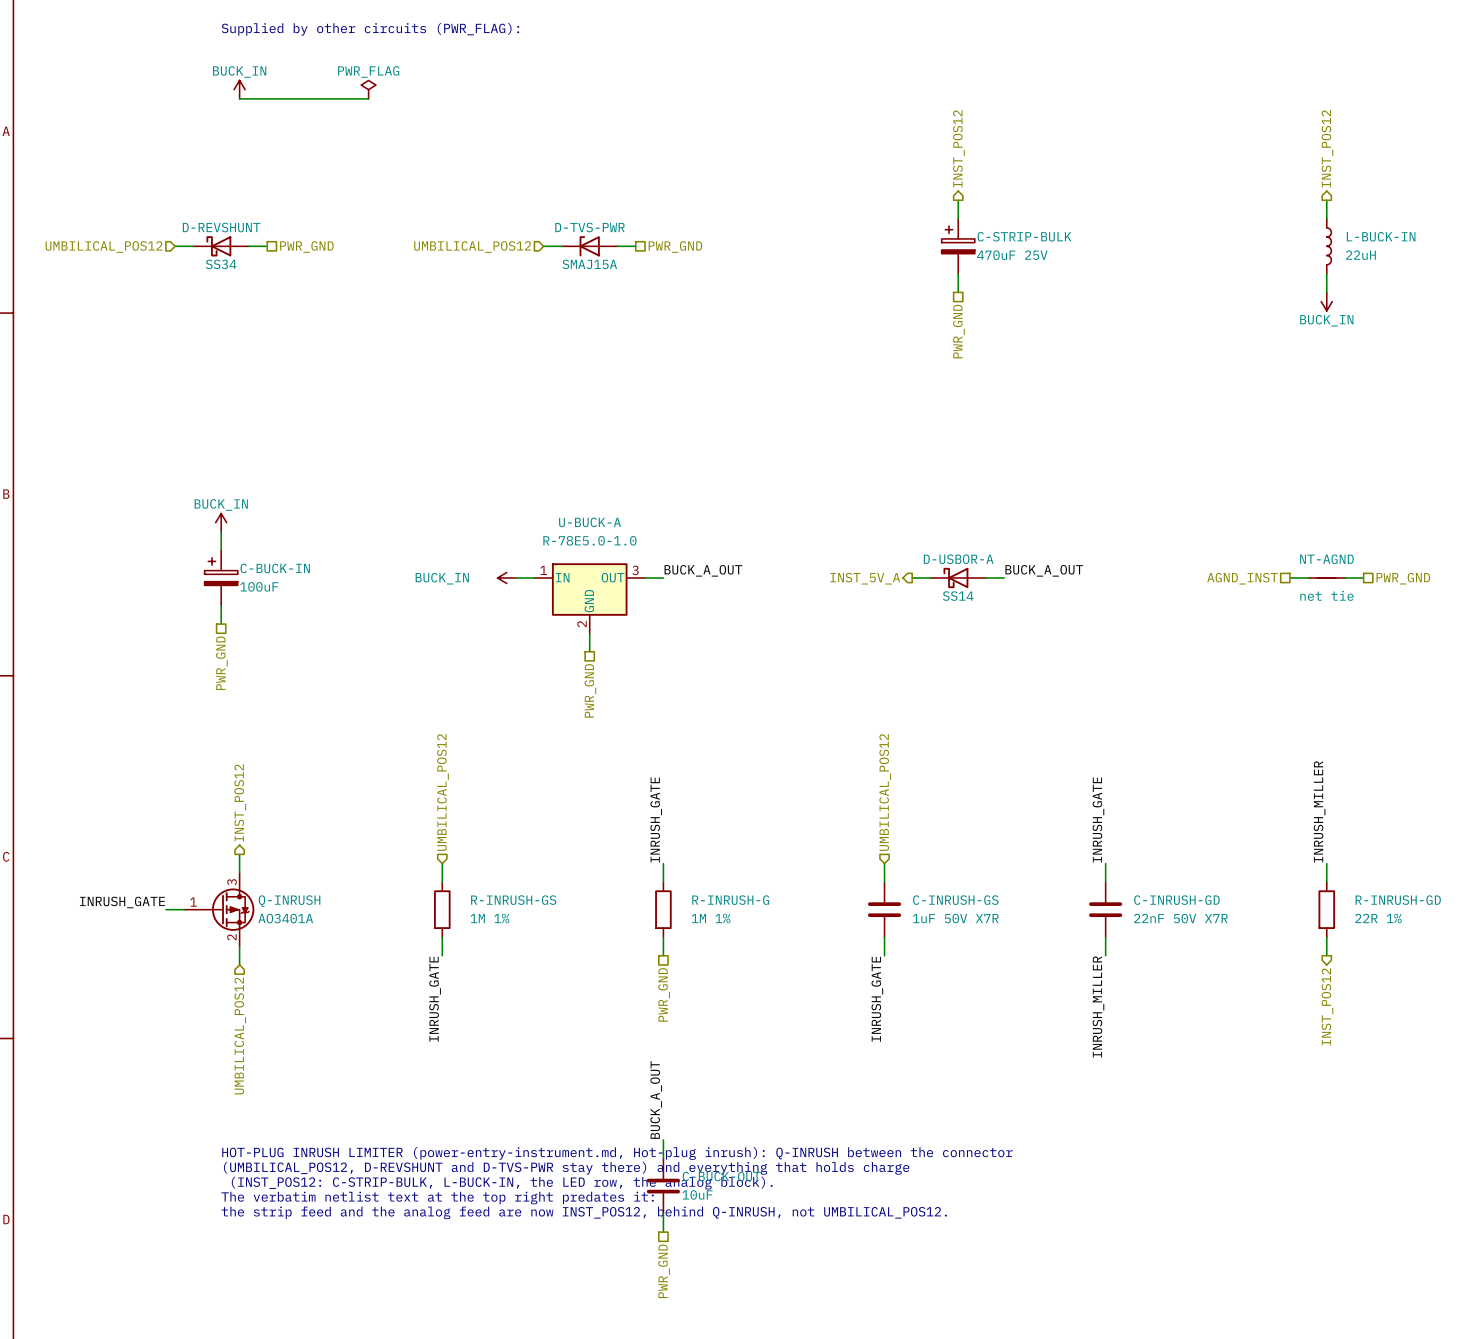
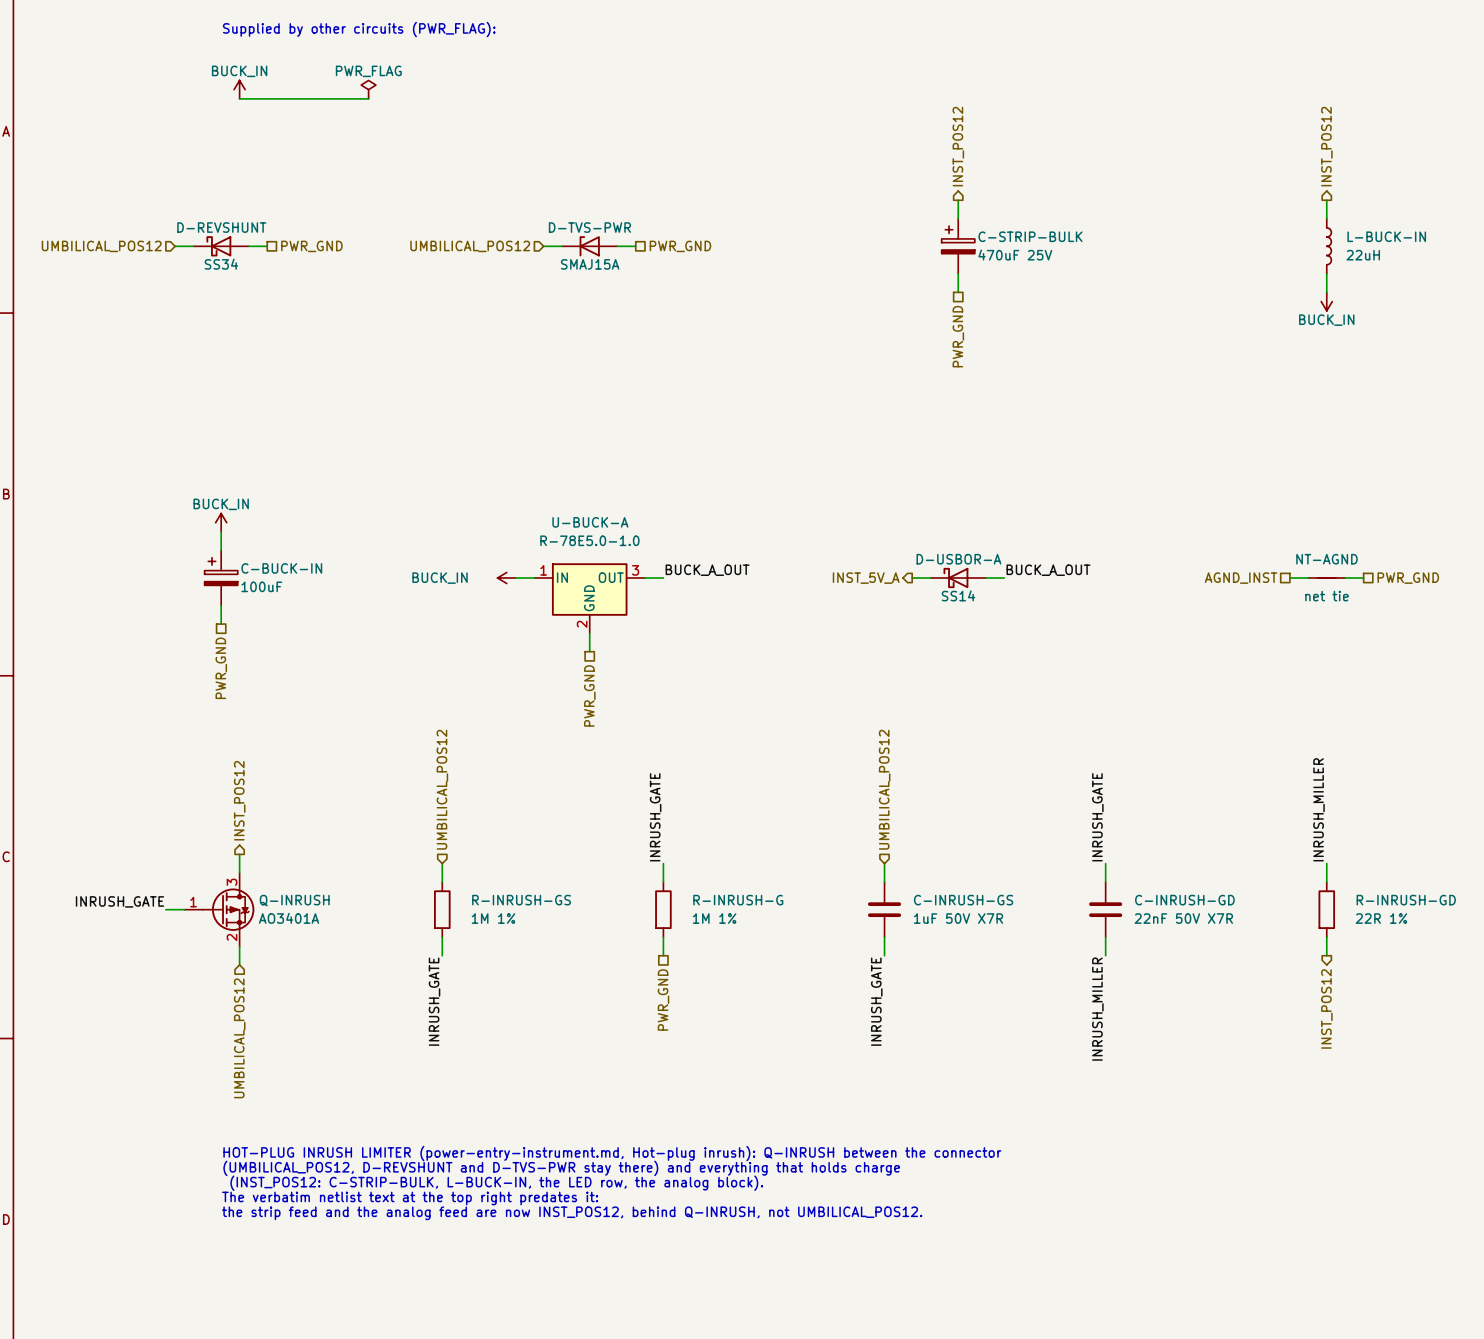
label: BUCK_A_OUT (656, 1099) -> none
wire: (663, 1140) (663, 1158) -> none
C-BUCK-OUT: 10uF (663, 1186) -> none
wire: (663, 1213) (663, 1232) -> none
hierarchical label: PWR_GND (664, 1271) -> none

